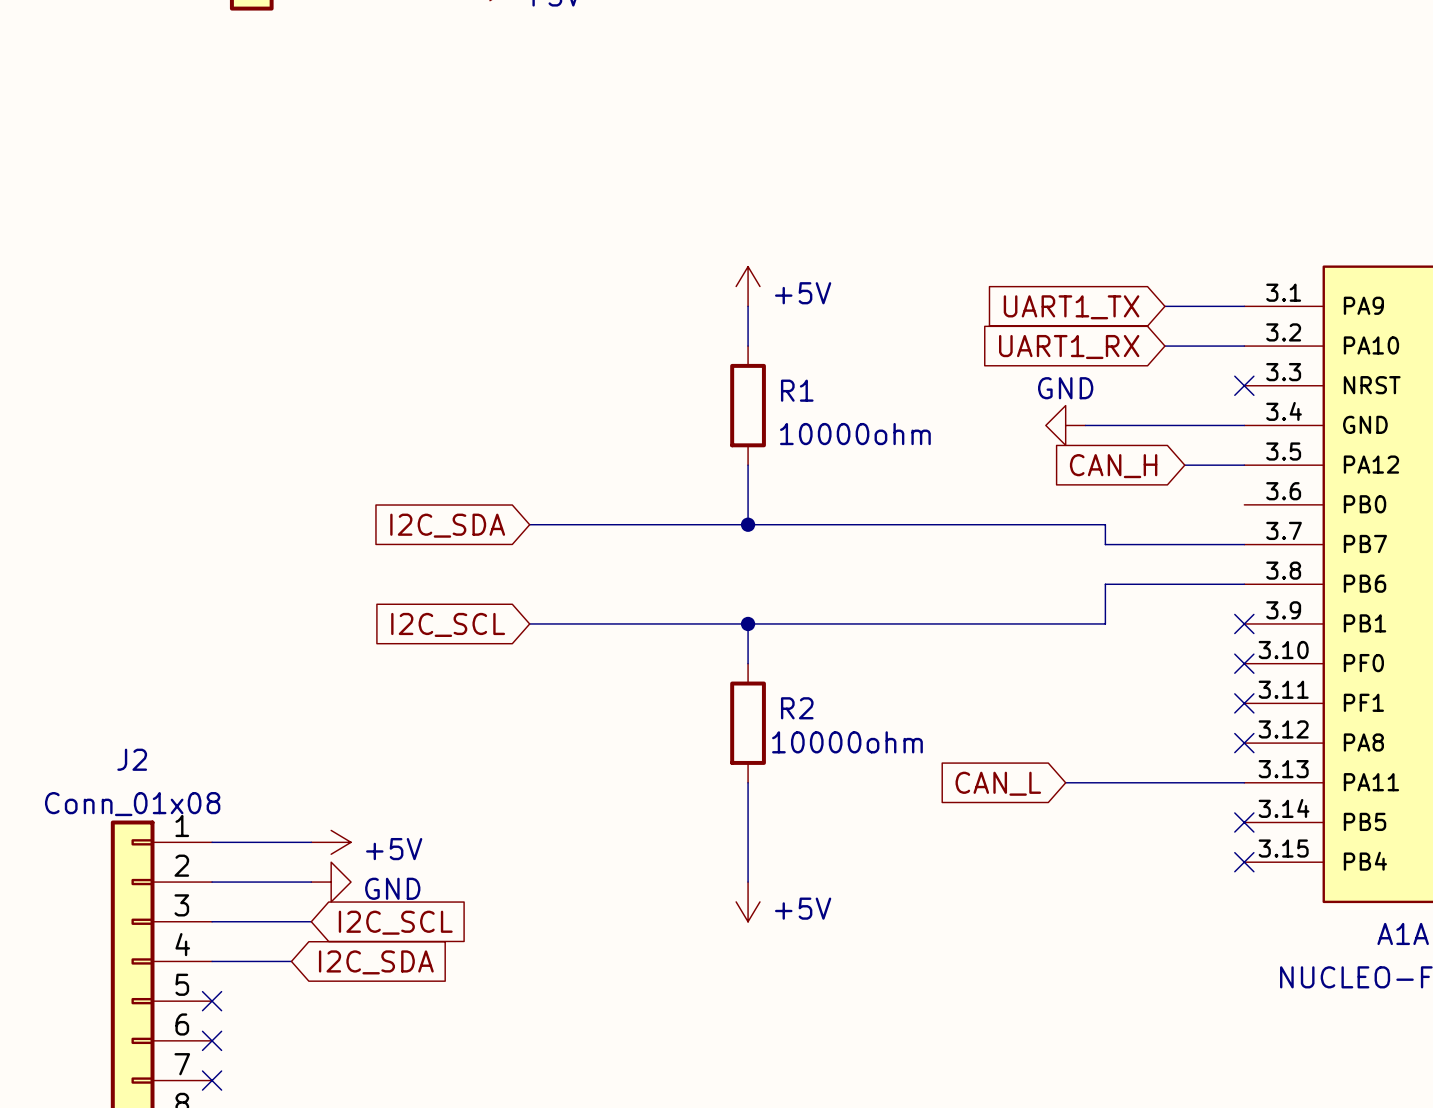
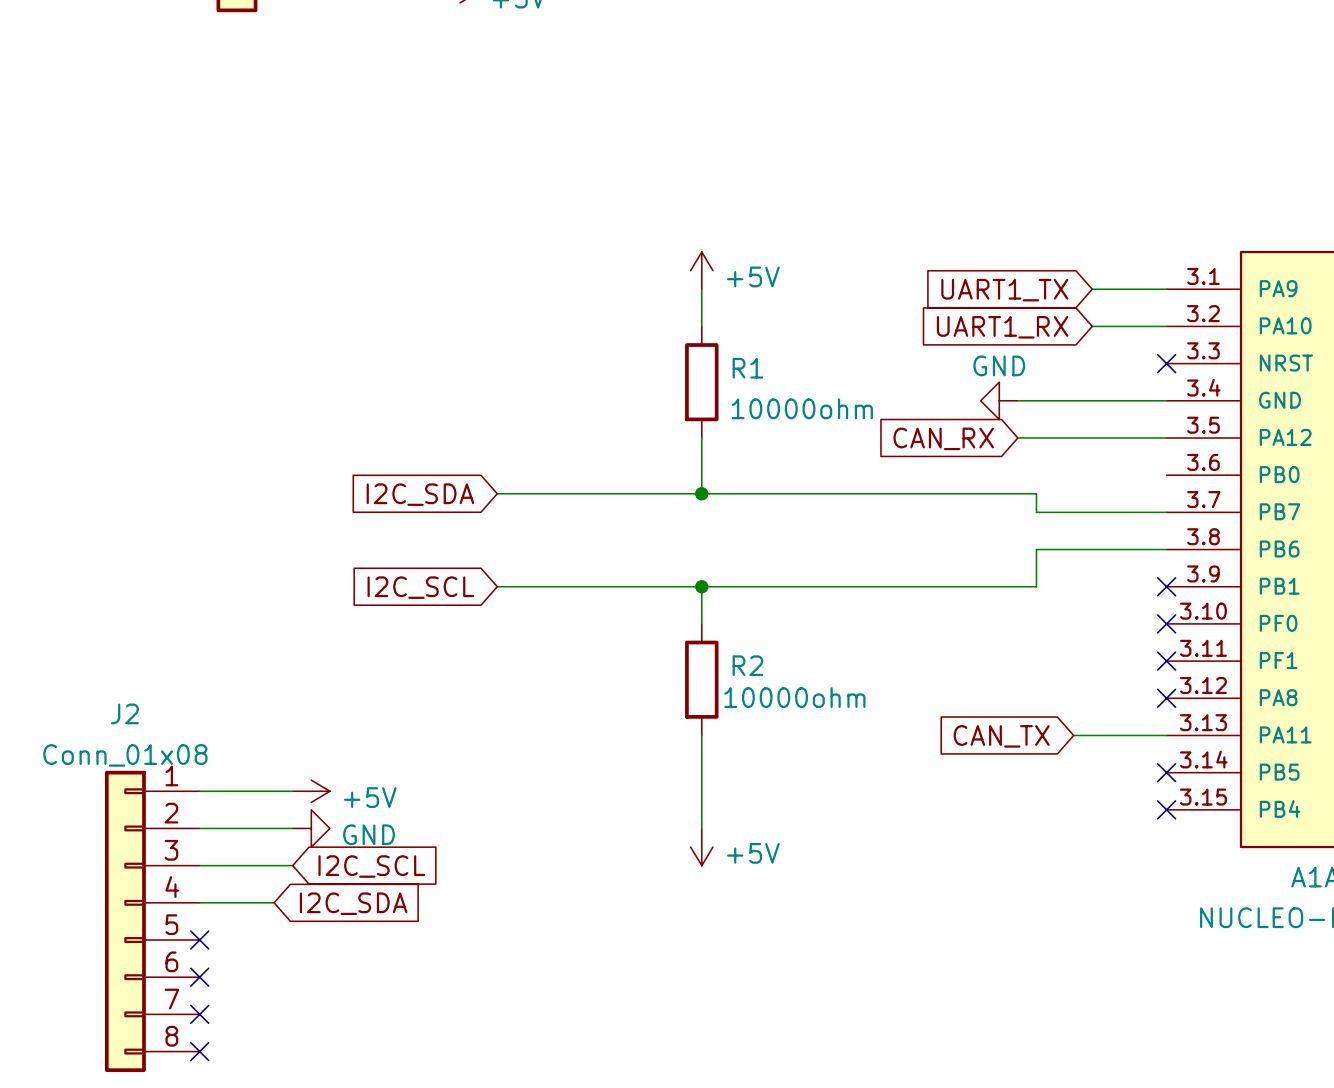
wire: none -> (1017, 437) (1110, 437)
global label: CAN_H (1113, 466) -> CAN_RX (943, 438)
wire: (1065, 782) (1145, 782) -> none
global label: CAN_L (998, 783) -> CAN_TX (1001, 736)

